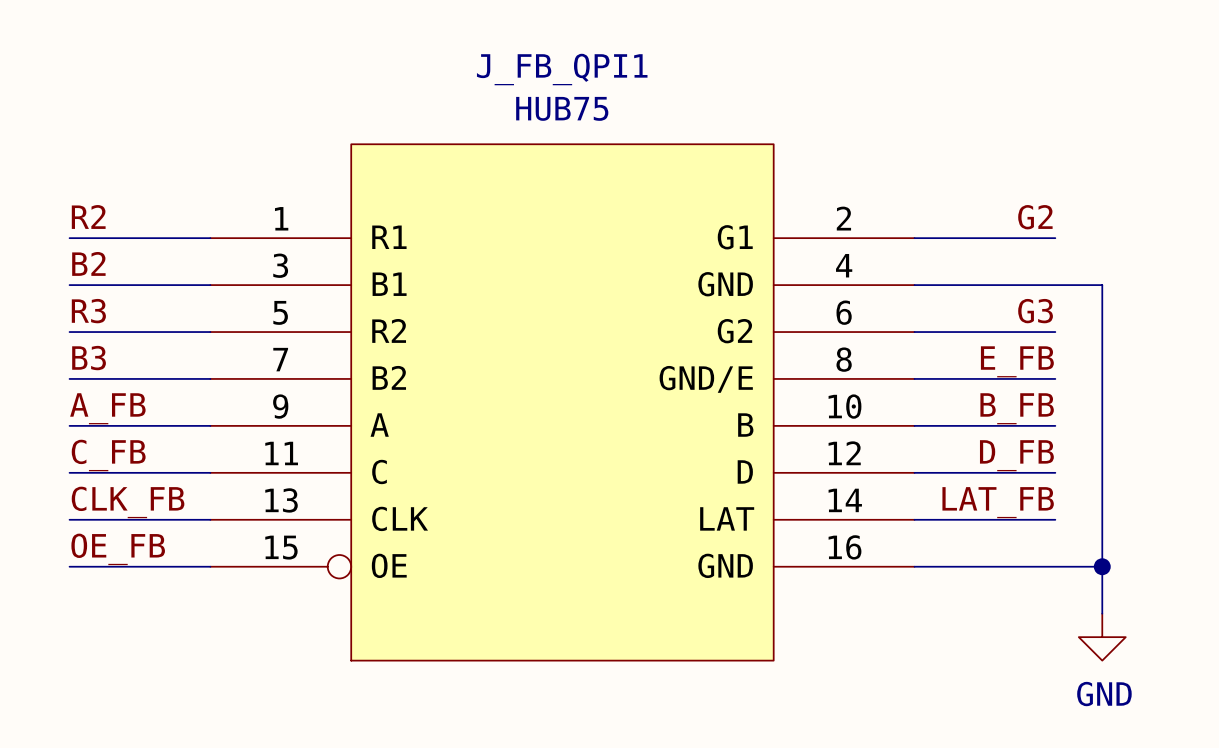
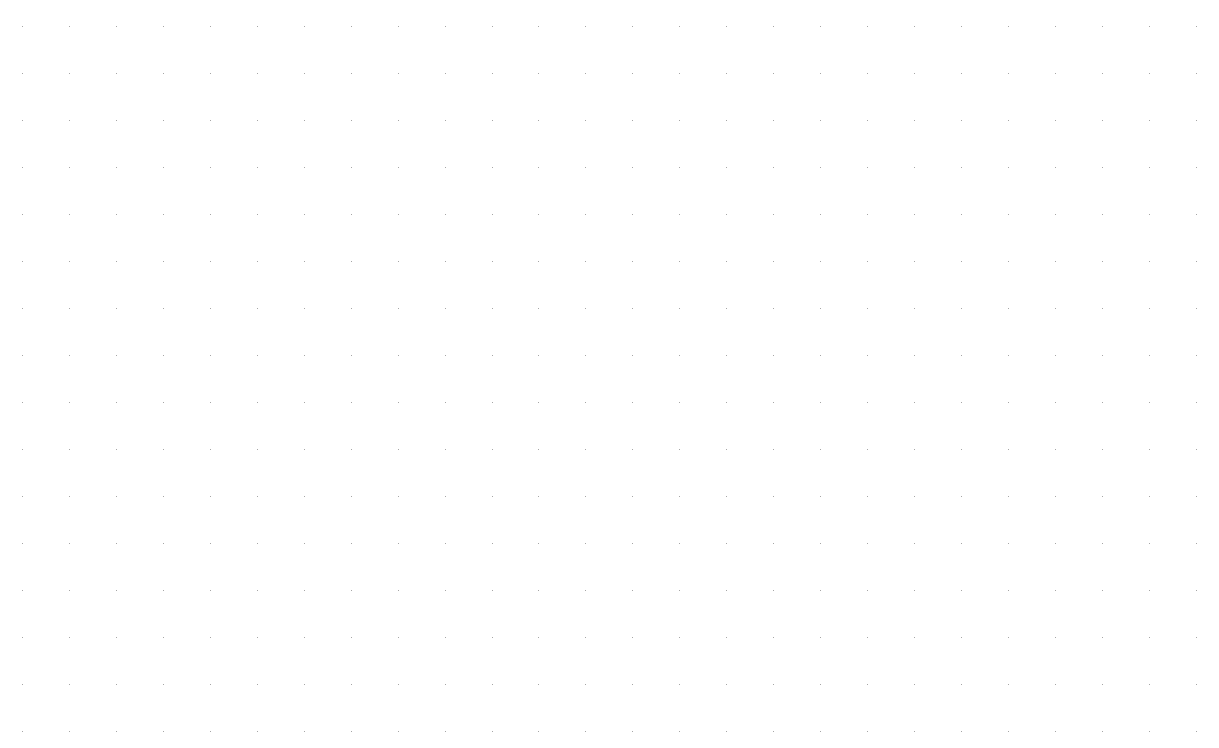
label: R2 (88, 216) -> none
label: G2 (1035, 217) -> none
wire: (69, 238) (210, 238) -> none
wire: (914, 238) (1055, 238) -> none
label: B2 (88, 263) -> none
wire: (69, 285) (210, 285) -> none
wire: (914, 285) (1102, 285) (1102, 613) -> none
label: R3 (88, 311) -> none
label: G3 (1035, 311) -> none
wire: (69, 332) (210, 332) -> none
wire: (914, 332) (1055, 332) -> none
label: B3 (89, 358) -> none
label: E_FB (1017, 361) -> none
wire: (69, 378) (210, 378) -> none
wire: (914, 378) (1055, 378) -> none
J_FB_QPI1: HUB75 (562, 402) -> none
label: A_FB (107, 408) -> none
label: B_FB (1017, 408) -> none
wire: (69, 425) (210, 425) -> none
wire: (914, 425) (1055, 425) -> none
label: C_FB (108, 455) -> none
label: D_FB (1016, 455) -> none
wire: (69, 472) (210, 472) -> none
wire: (914, 472) (1055, 472) -> none
label: CLK_FB (128, 502) -> none
label: LAT_FB (998, 502) -> none
wire: (69, 519) (210, 519) -> none
wire: (914, 519) (1055, 519) -> none
label: OE_FB (118, 549) -> none
wire: (69, 566) (210, 566) -> none
wire: (914, 566) (1102, 566) -> none
junction: (1102, 566) -> none
power symbol: GND (1102, 637) -> none

